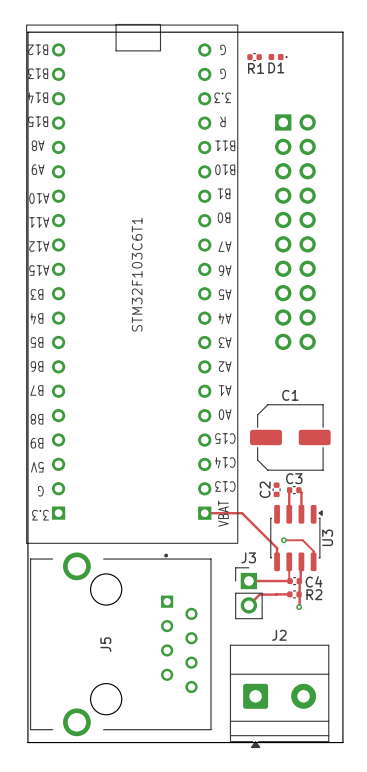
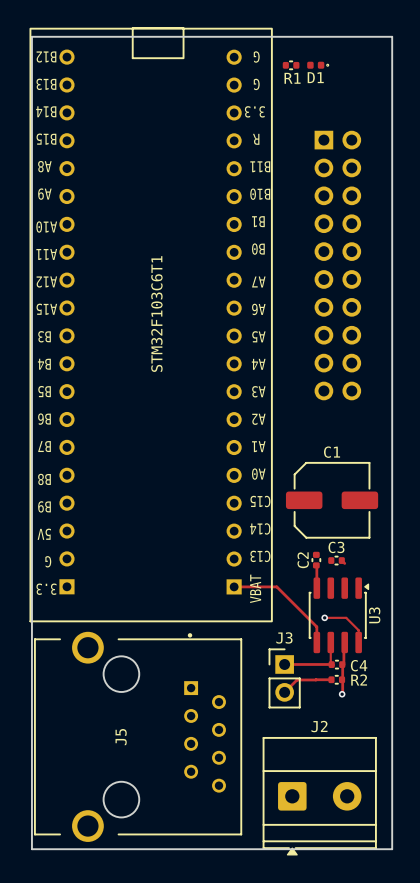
track: (289, 490) (289, 514) -> none
track: (301, 492) (301, 514) -> none
track: none -> (316, 565) (316, 588)

